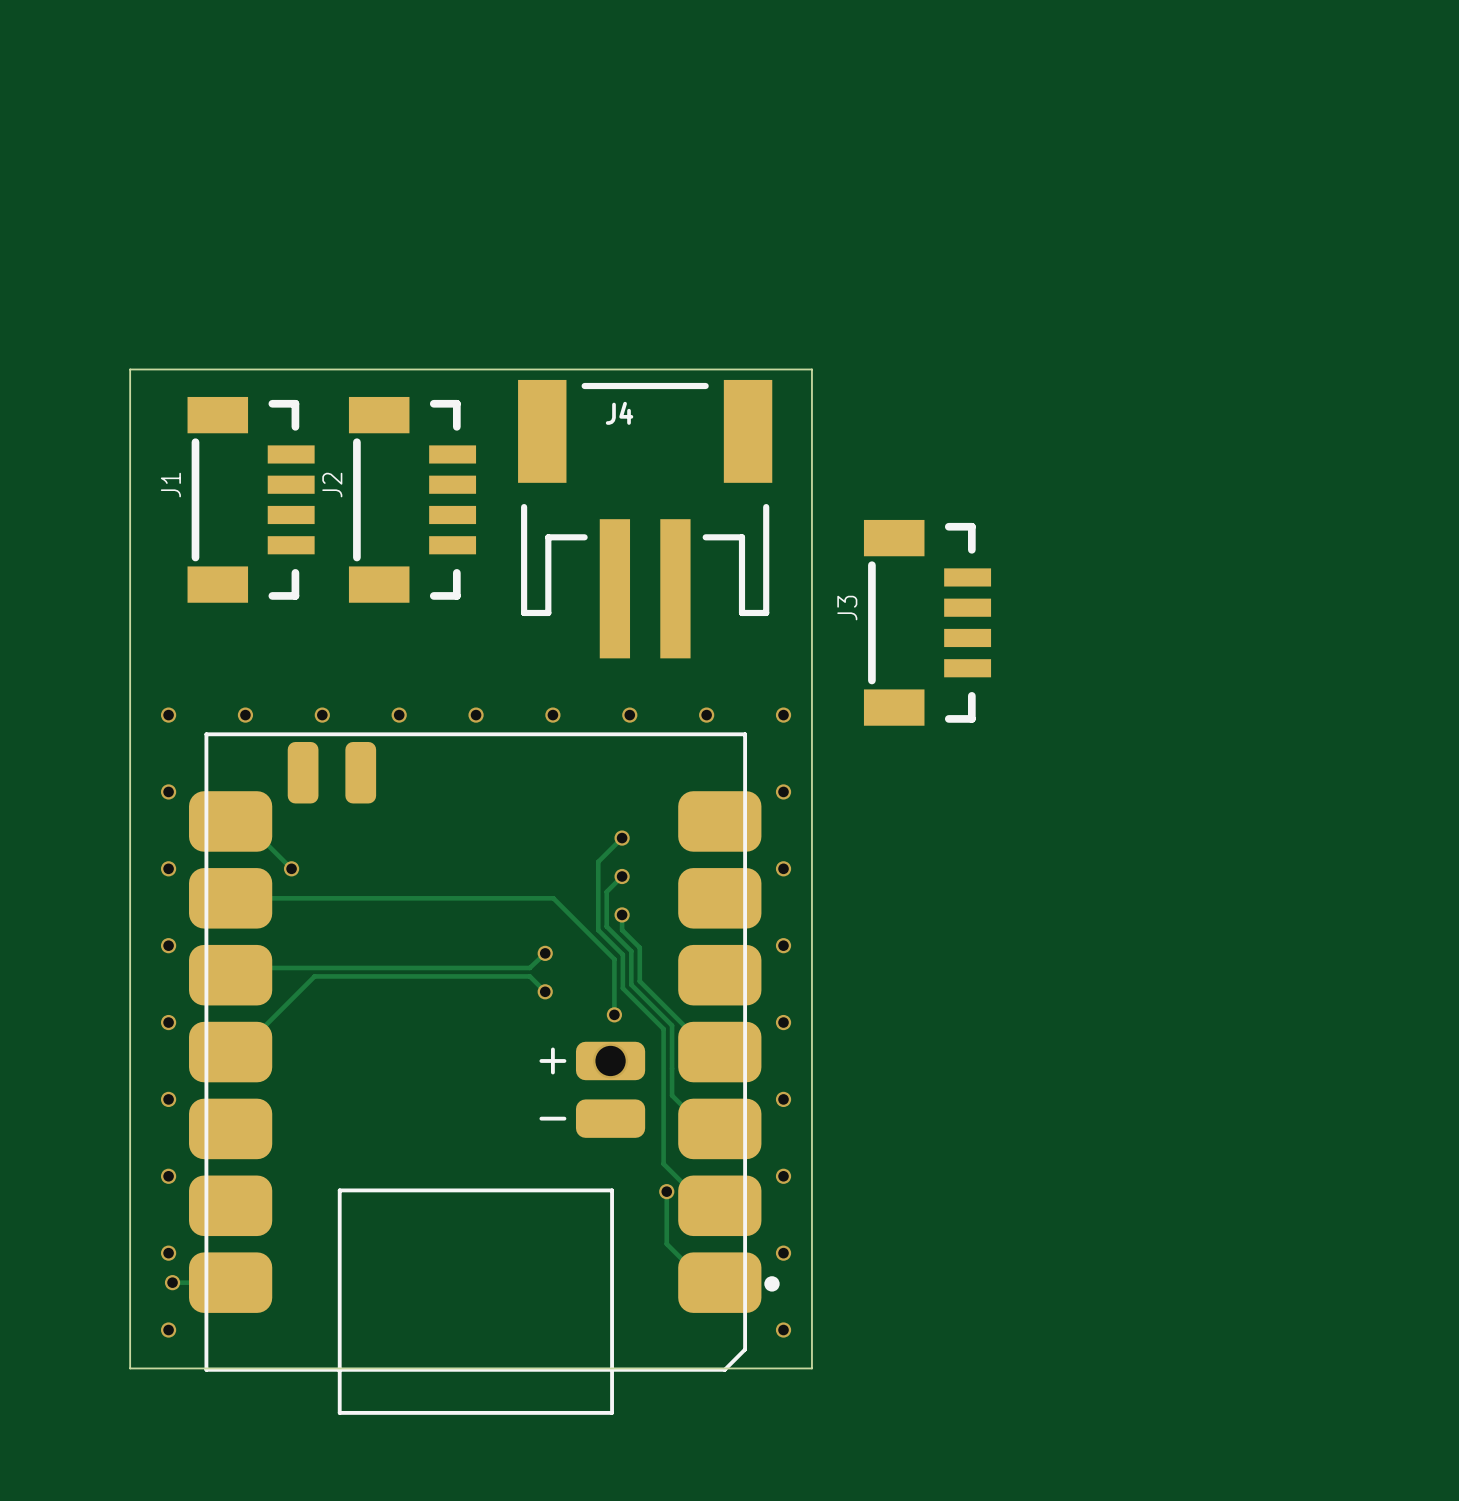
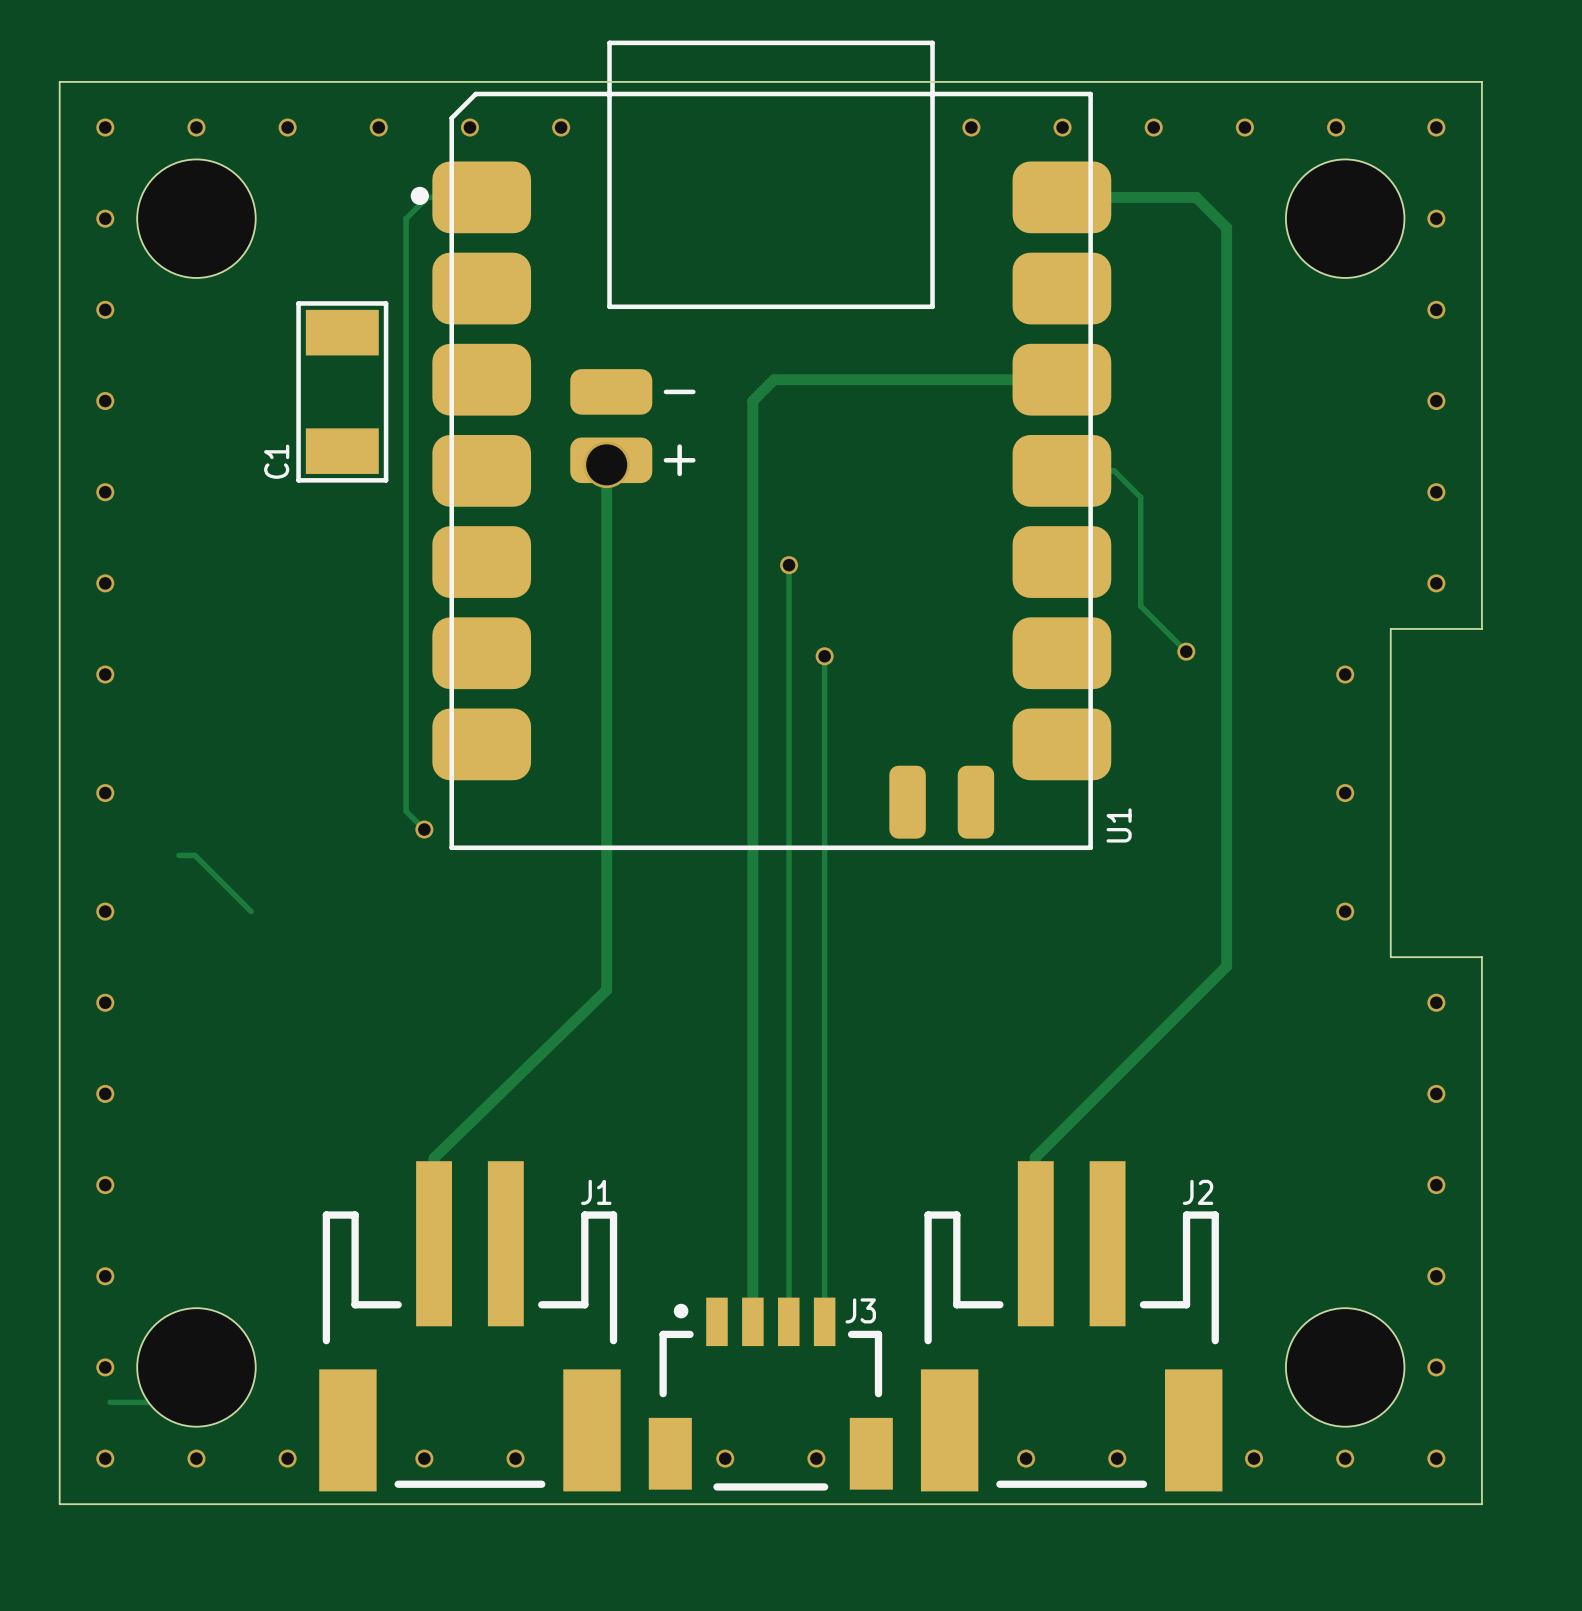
via: none -> (105, 127)
via: none -> (196, 127)
via: none -> (287, 127)
via: none -> (378, 127)
via: none -> (469, 127)
via: none -> (561, 127)
via: none -> (971, 127)
via: none -> (1062, 127)
via: none -> (1153, 127)
via: none -> (1244, 127)
via: none -> (1336, 127)
via: none -> (1436, 127)
track: none -> (481, 197) (427, 197) (406, 218) (406, 811) (424, 829)
track: none -> (1061, 197) (1196, 197) (1226, 227) (1226, 966) (1035, 1157) (1035, 1243)
via: none -> (105, 218)
part: none -> (196, 218)
part: none -> (1345, 218)
via: none -> (1436, 218)
via: none -> (105, 309)
via: none -> (1436, 309)
board edge: (130, 369) (811, 369) (811, 1368) -> (59, 319) (59, 81) (1481, 81) (1481, 628) (1390, 628) (1390, 957) (1481, 957) (1481, 1504) (868, 1504)
J1 footprint: [187, 396, 315, 603] -> [319, 1161, 621, 1492]
J2 footprint: [348, 396, 477, 603] -> [920, 1161, 1223, 1492]
track: none -> (1061, 379) (774, 379) (752, 401) (752, 1321)
C1: none -> (342, 391)
via: none -> (105, 401)
via: none -> (1436, 401)
U1: none -> (760, 445)
J1 name position: J1 (170, 485) -> J1 (596, 1192)
J2 name position: J2 (332, 485) -> J2 (1198, 1192)
track: none -> (611, 460) (606, 464) (606, 990) (434, 1158) (434, 1243)
via: none -> (606, 464)
track: none -> (1061, 470) (1114, 470) (1140, 497) (1140, 606) (1186, 651)
via: none -> (105, 492)
via: none -> (1436, 492)
J4: (645, 519) -> none
J3 footprint: [863, 519, 992, 726] -> [648, 1297, 893, 1491]
track: none -> (789, 565) (789, 1321)
via: none -> (789, 565)
via: none -> (105, 583)
via: none -> (1436, 583)
J3 name position: J3 (847, 608) -> J3 (860, 1310)
via: none -> (1186, 651)
track: none -> (824, 656) (824, 1321)
via: none -> (824, 656)
via: none -> (105, 674)
via: none -> (1345, 674)
via: (168, 715) -> none
via: (245, 715) -> none
via: (322, 715) -> none
via: (399, 715) -> none
via: (476, 715) -> none
via: (552, 715) -> none
via: (629, 715) -> none
via: (706, 715) -> none
via: (783, 715) -> none
via: none -> (1345, 793)
via position: (168, 791) -> (105, 793)
via: (783, 791) -> none
via: none -> (424, 829)
track: (622, 838) (598, 861) (598, 930) (622, 954) (622, 988) (663, 1029) (663, 1163) (705, 1205) (719, 1205) -> none
via: (622, 838) -> none
via: (291, 868) -> none
via: (783, 868) -> none
via: none -> (1345, 911)
track: (622, 876) (606, 891) (606, 926) (631, 951) (631, 984) (672, 1025) (672, 1095) (705, 1128) (719, 1128) -> none
via: (622, 876) -> none
track: (230, 898) (553, 898) (614, 959) (614, 1014) -> none
track: (622, 914) (622, 930) (639, 947) (639, 981) (710, 1052) (719, 1052) -> none
via: (622, 914) -> none
via: (783, 945) -> none
via: none -> (1436, 1002)
track: (545, 953) (529, 967) (237, 967) (230, 975) -> none
via: (545, 953) -> none
track: (545, 991) (529, 976) (314, 976) (239, 1052) (230, 1052) -> none
via: (545, 991) -> none
via: (614, 1014) -> none
via: (783, 1022) -> none
via: none -> (1436, 1093)
via: (610, 1060) -> none
part: (484, 1073) -> none
via: (783, 1099) -> none
via: none -> (1436, 1185)
via: (783, 1176) -> none
via: none -> (1436, 1276)
track: (666, 1191) (666, 1244) (705, 1282) (719, 1282) -> none
via: (666, 1191) -> none
part: none -> (196, 1367)
via: (783, 1253) -> none
part: none -> (1345, 1367)
via: none -> (1436, 1367)
via: (172, 1282) -> none
via: none -> (196, 1458)
via: none -> (287, 1458)
via: none -> (424, 1458)
via: none -> (515, 1458)
via: none -> (725, 1458)
via position: (783, 1330) -> (816, 1458)
via: none -> (1026, 1458)
via: none -> (1117, 1458)
via: none -> (1254, 1458)
via: none -> (1345, 1458)
via: none -> (1436, 1458)

